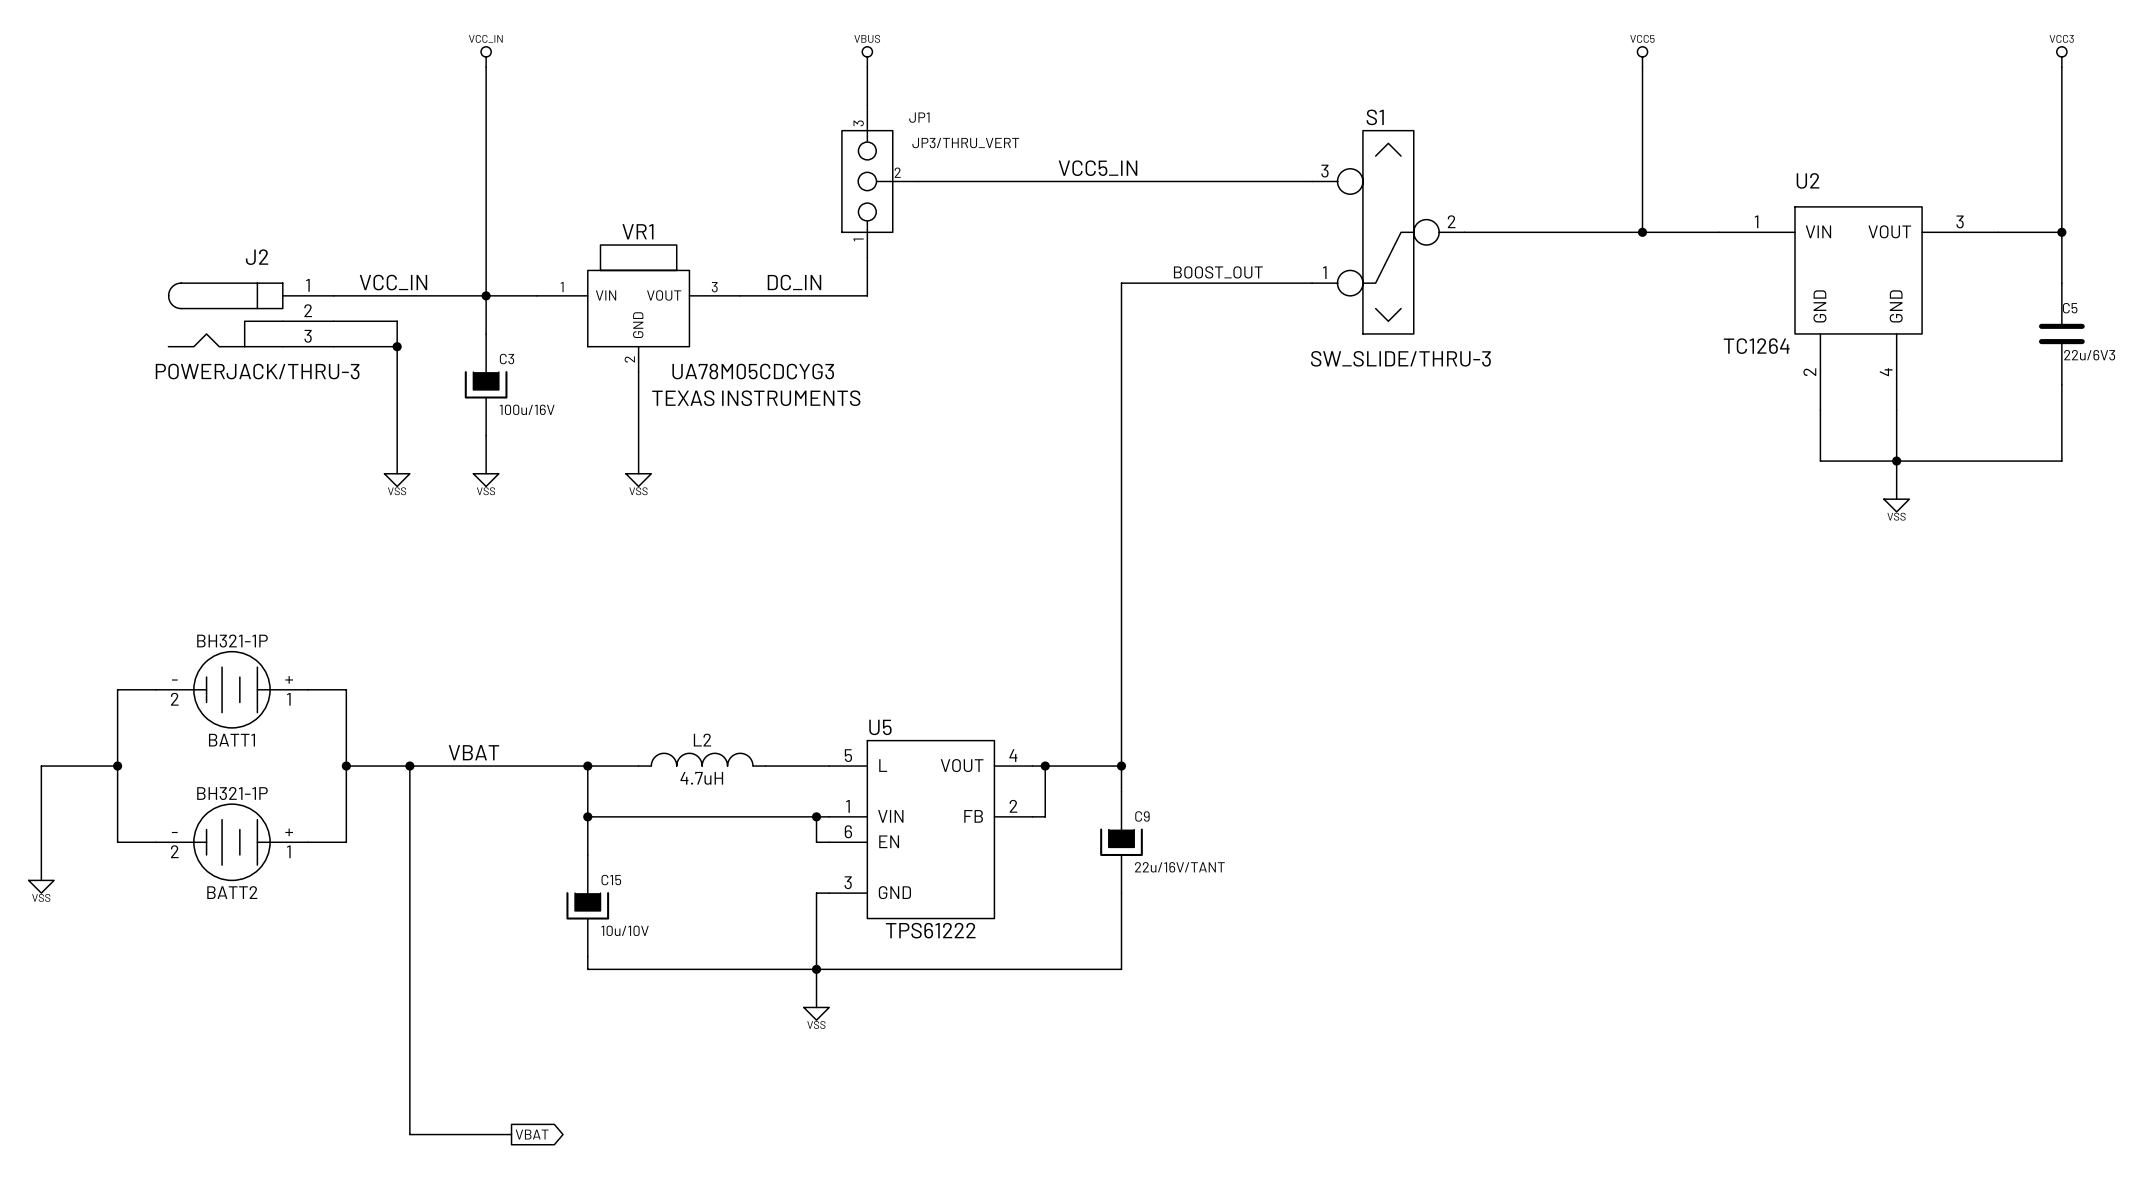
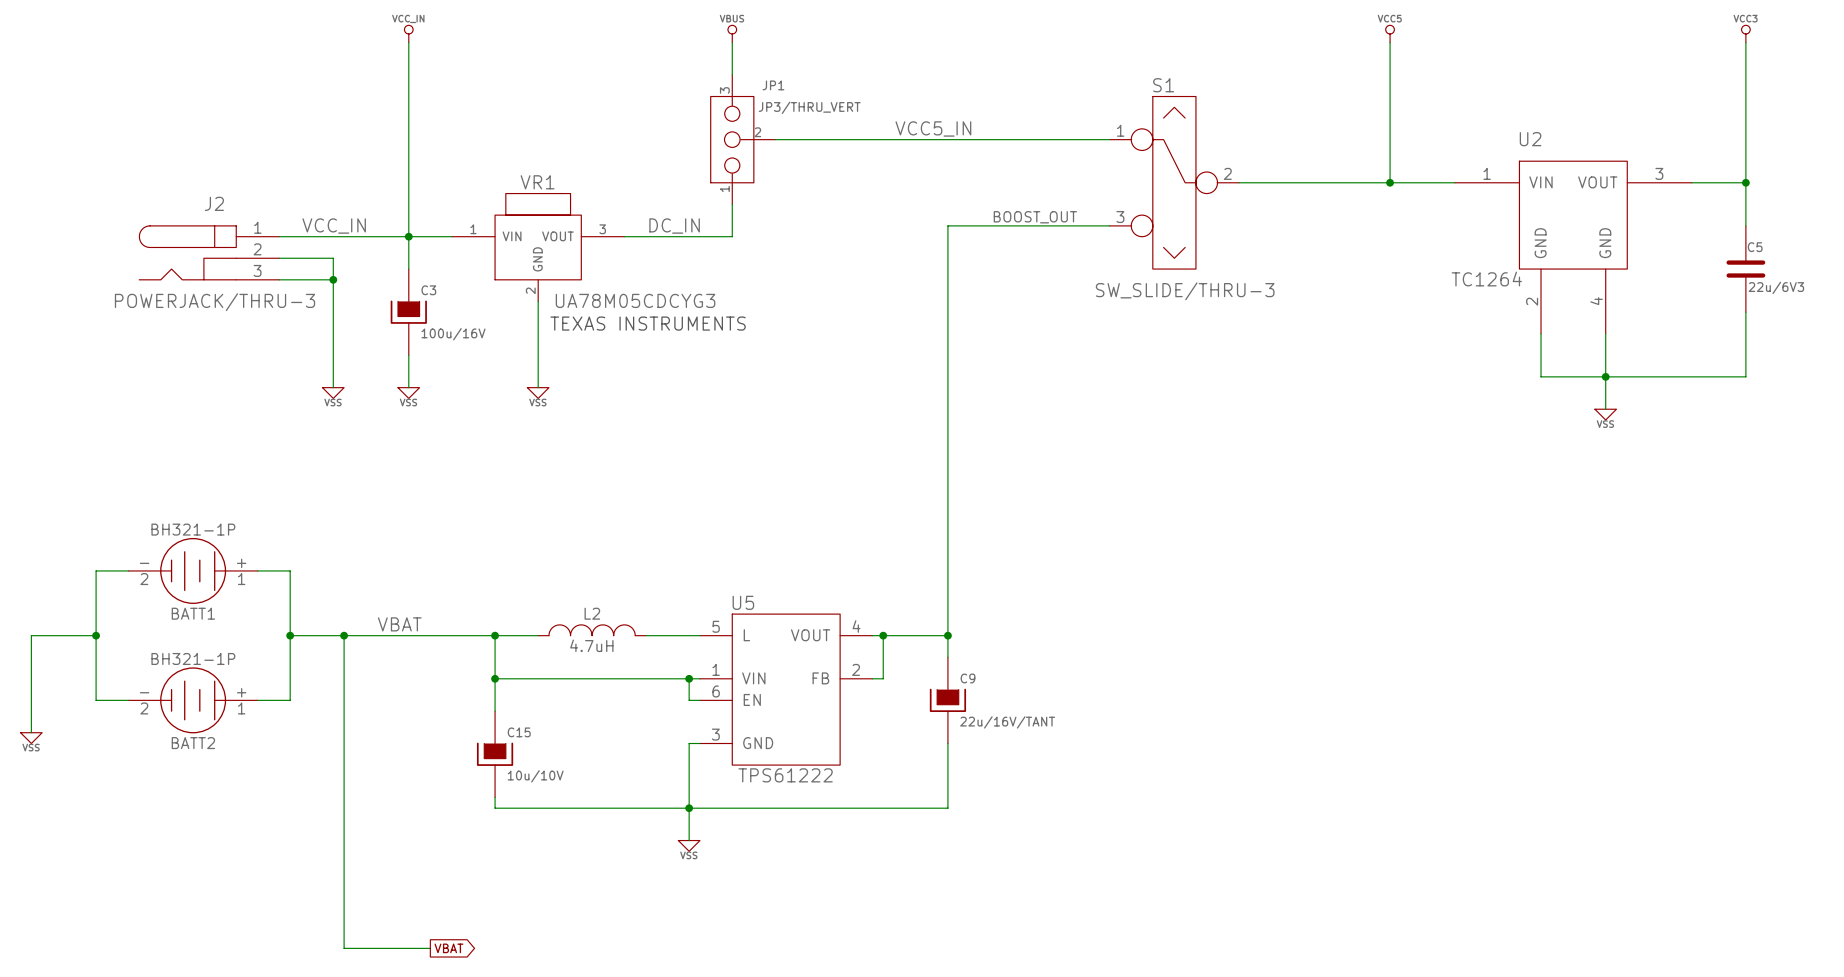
S1 flip: as is (1388, 232) -> up-down (1174, 182)

